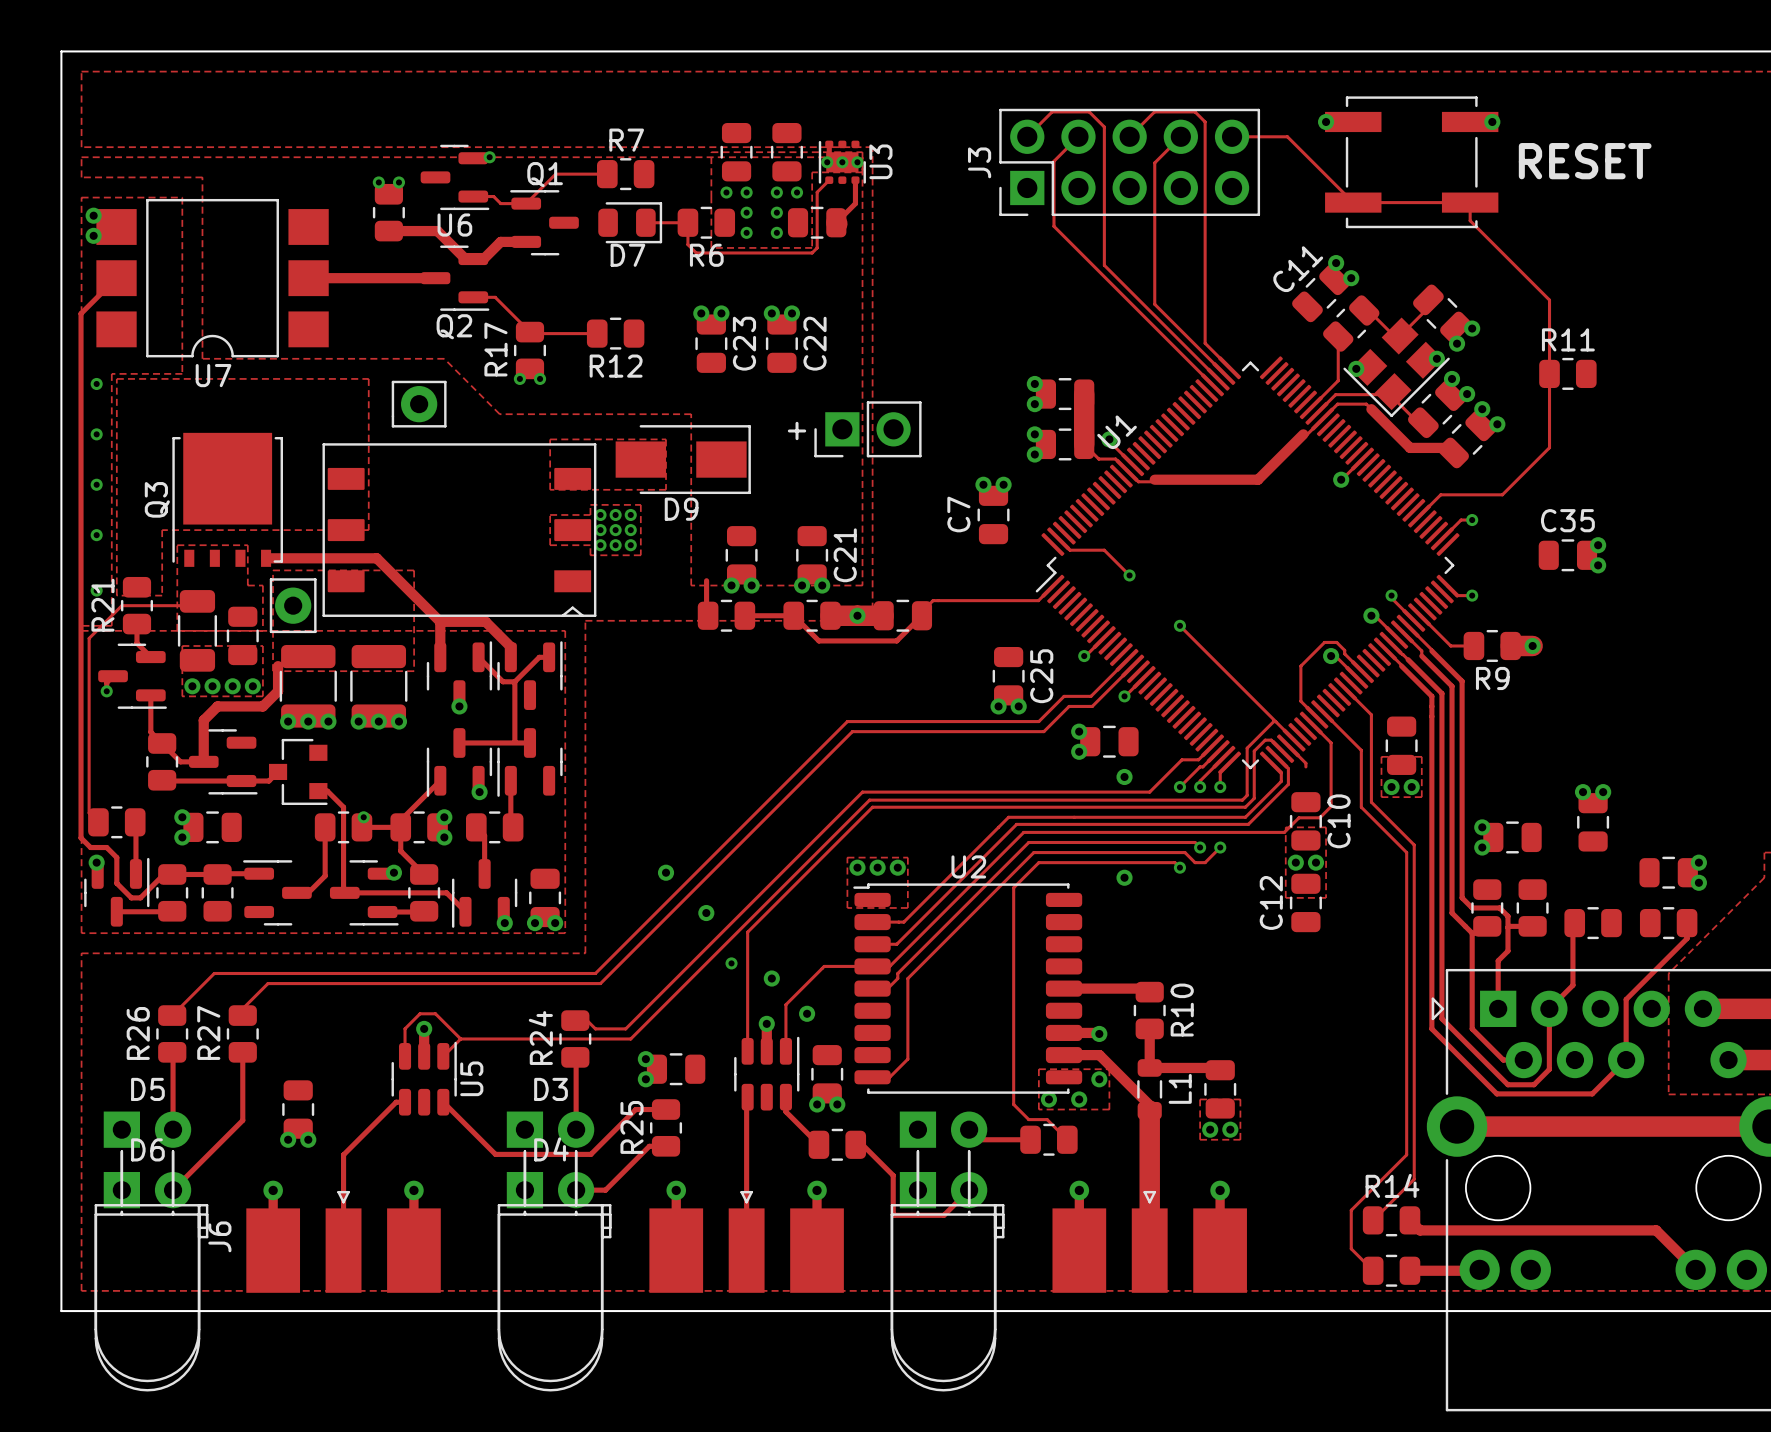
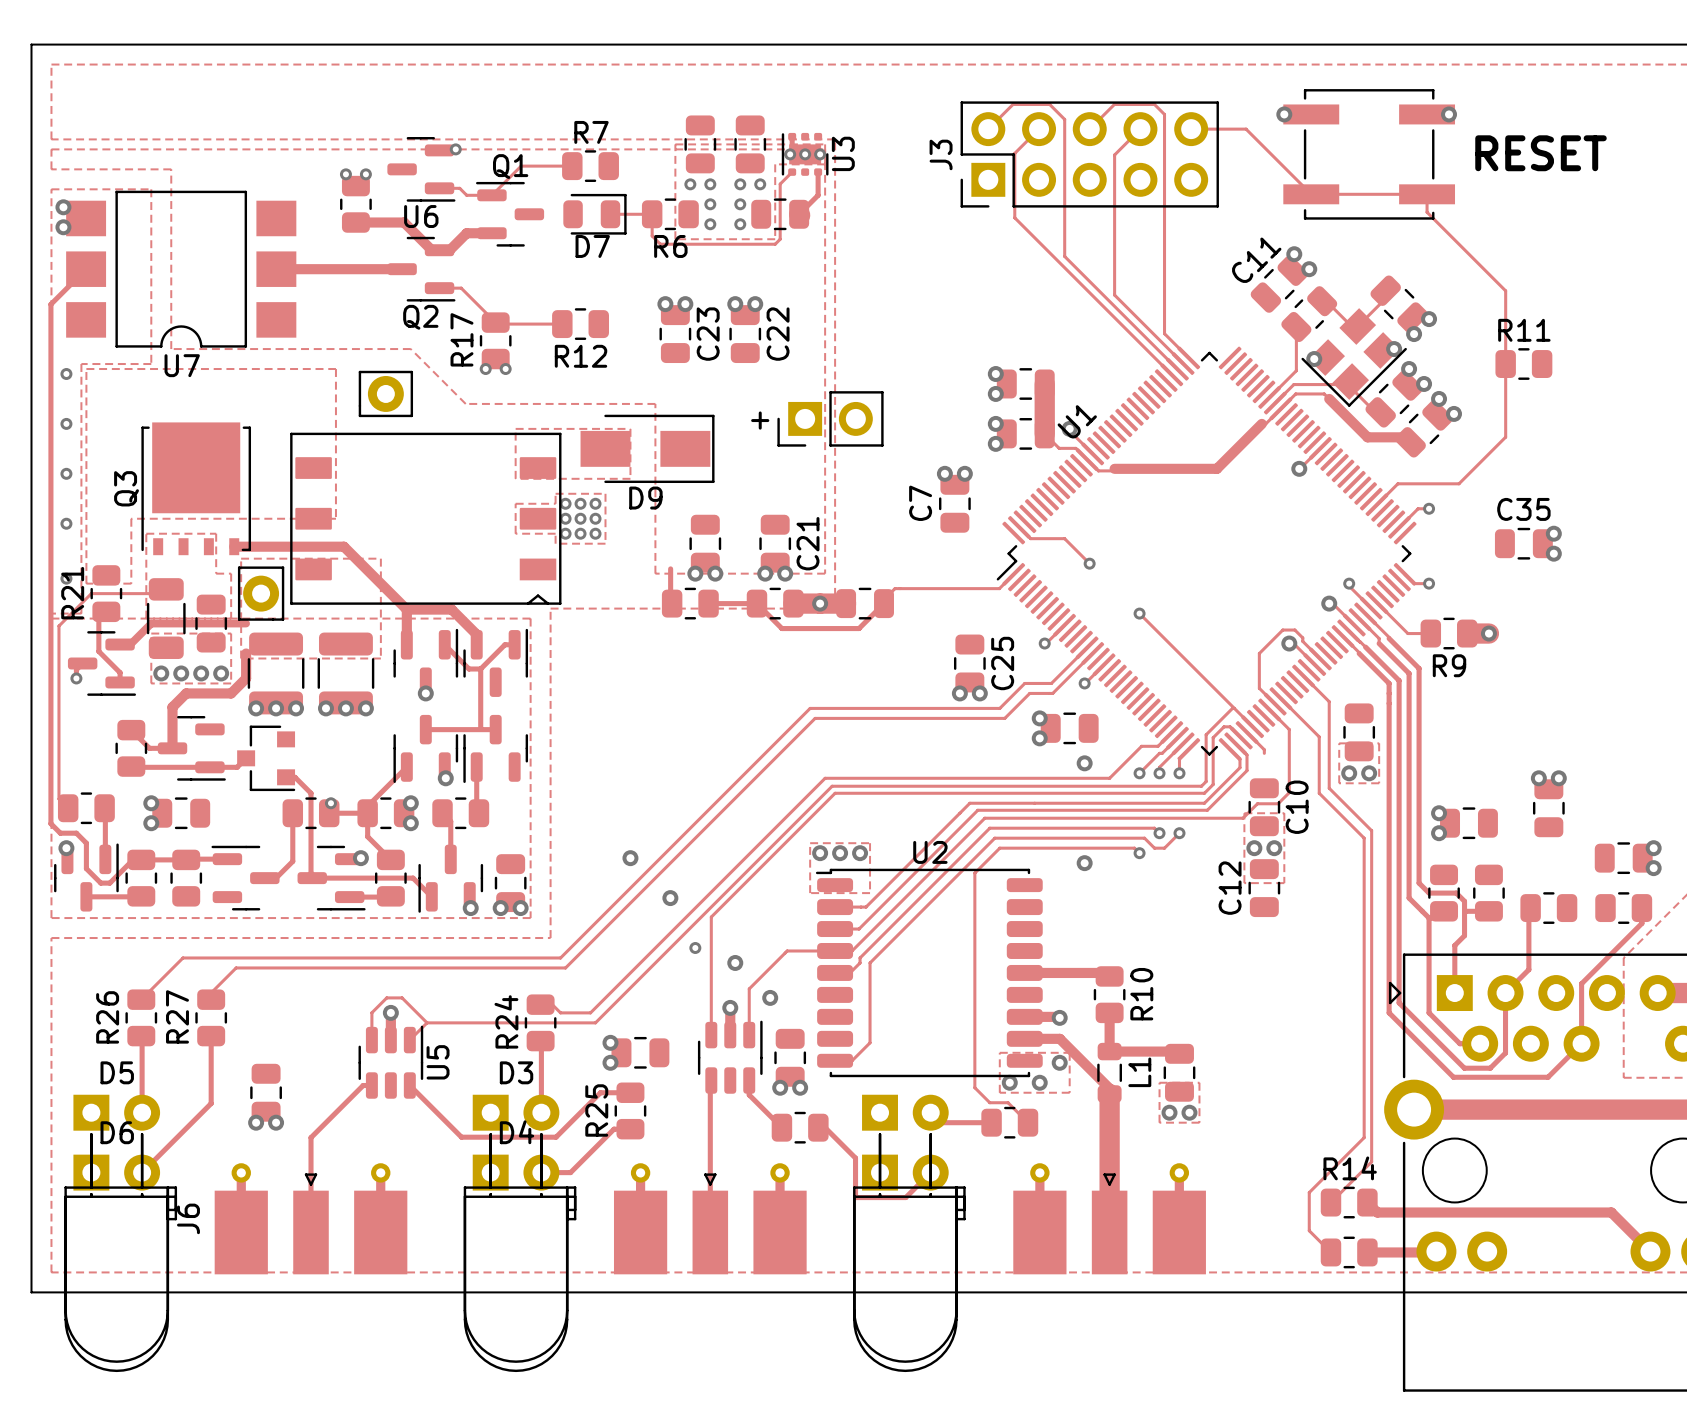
track: (136, 624) (136, 643) (150, 657) -> (106, 611) (98, 619) (98, 651) (120, 672) (120, 682)
track: none -> (246, 623) (151, 623) (130, 644)
track: (150, 695) (150, 732) (162, 743) -> none

